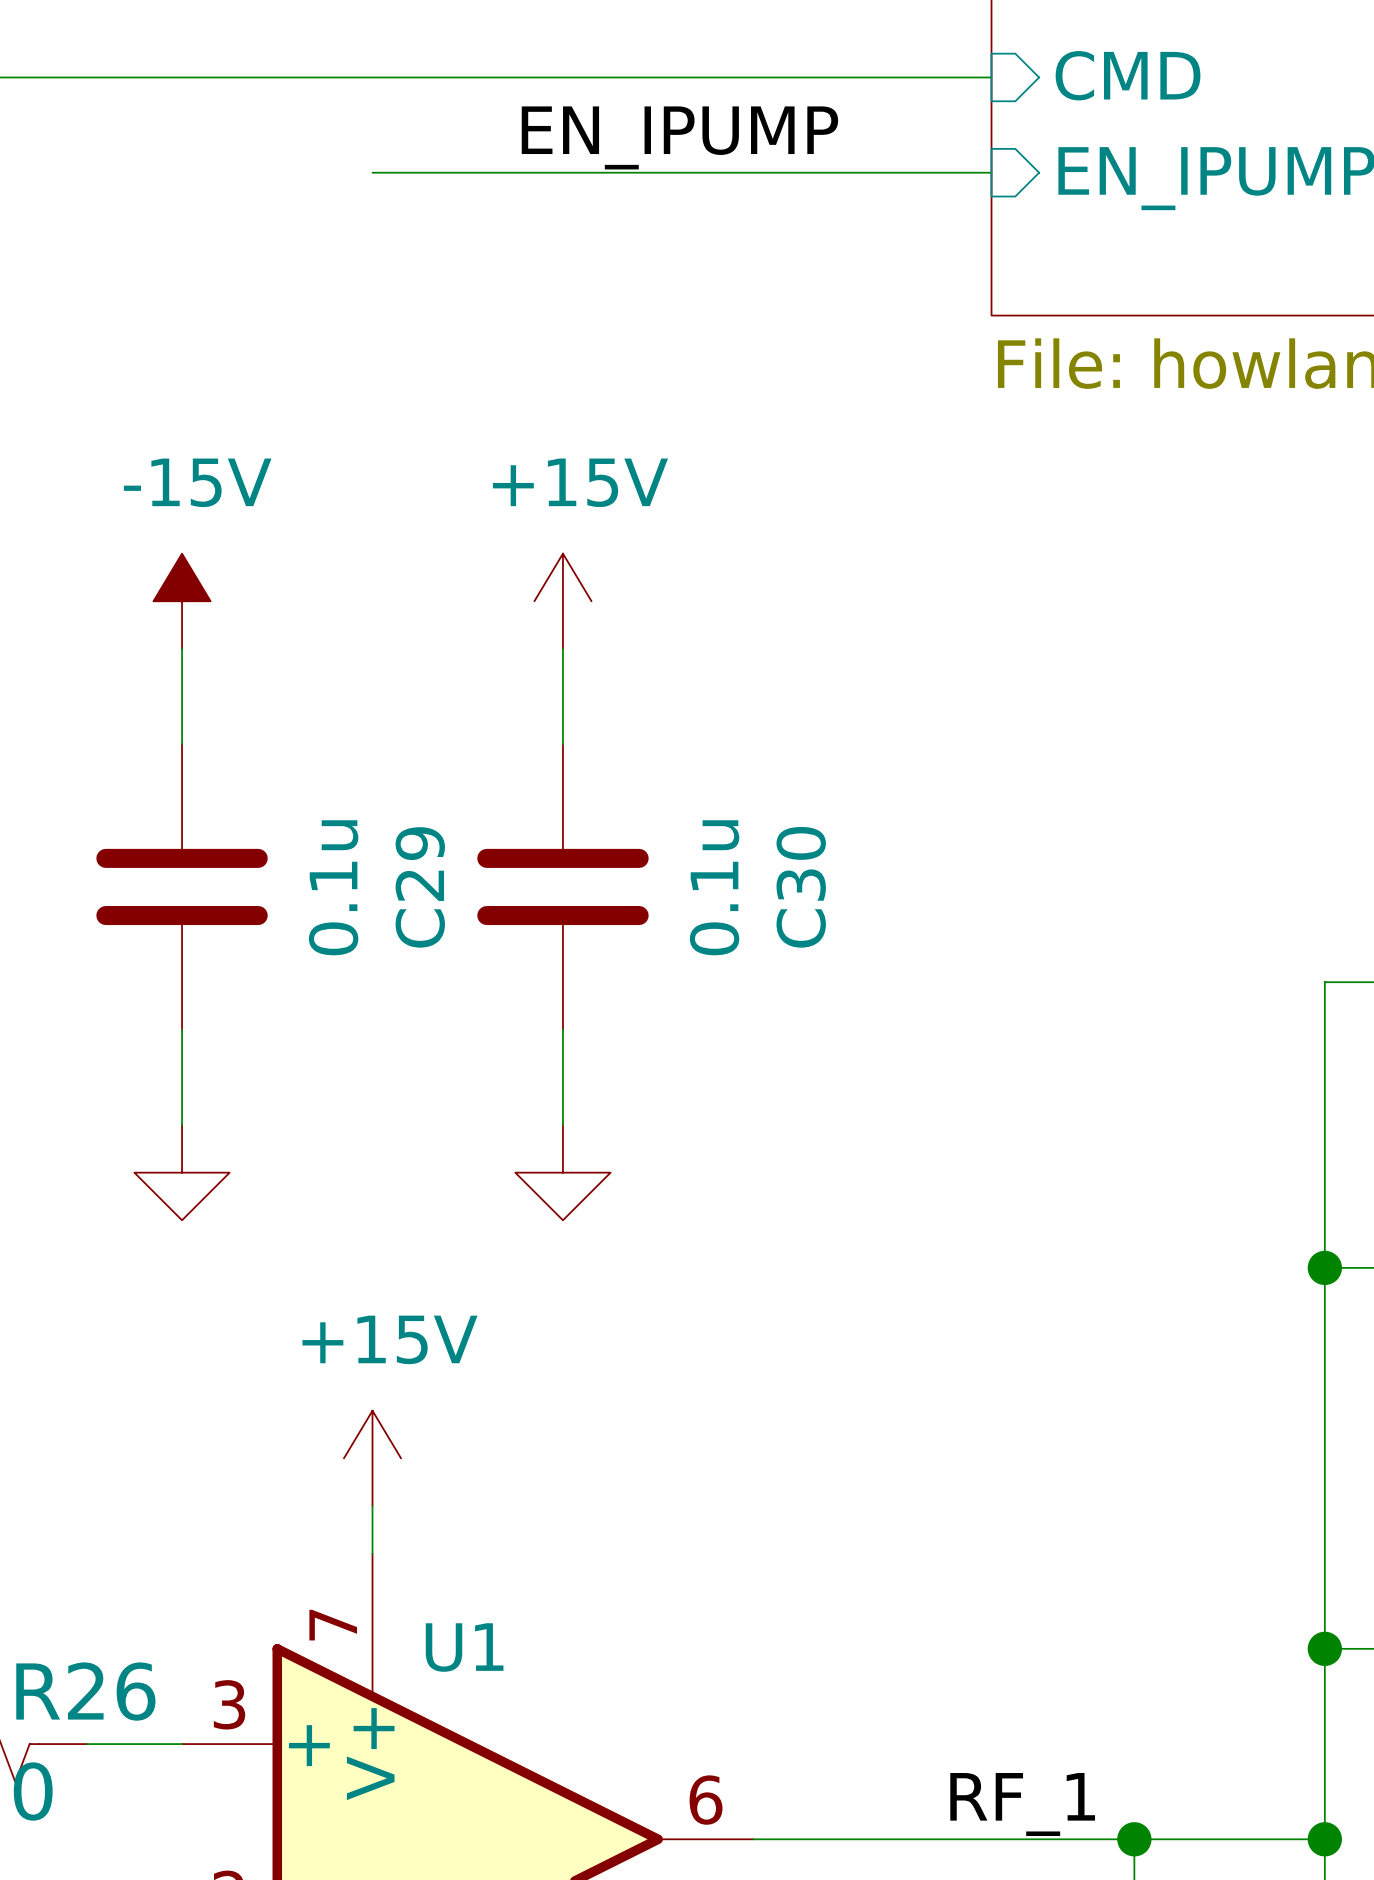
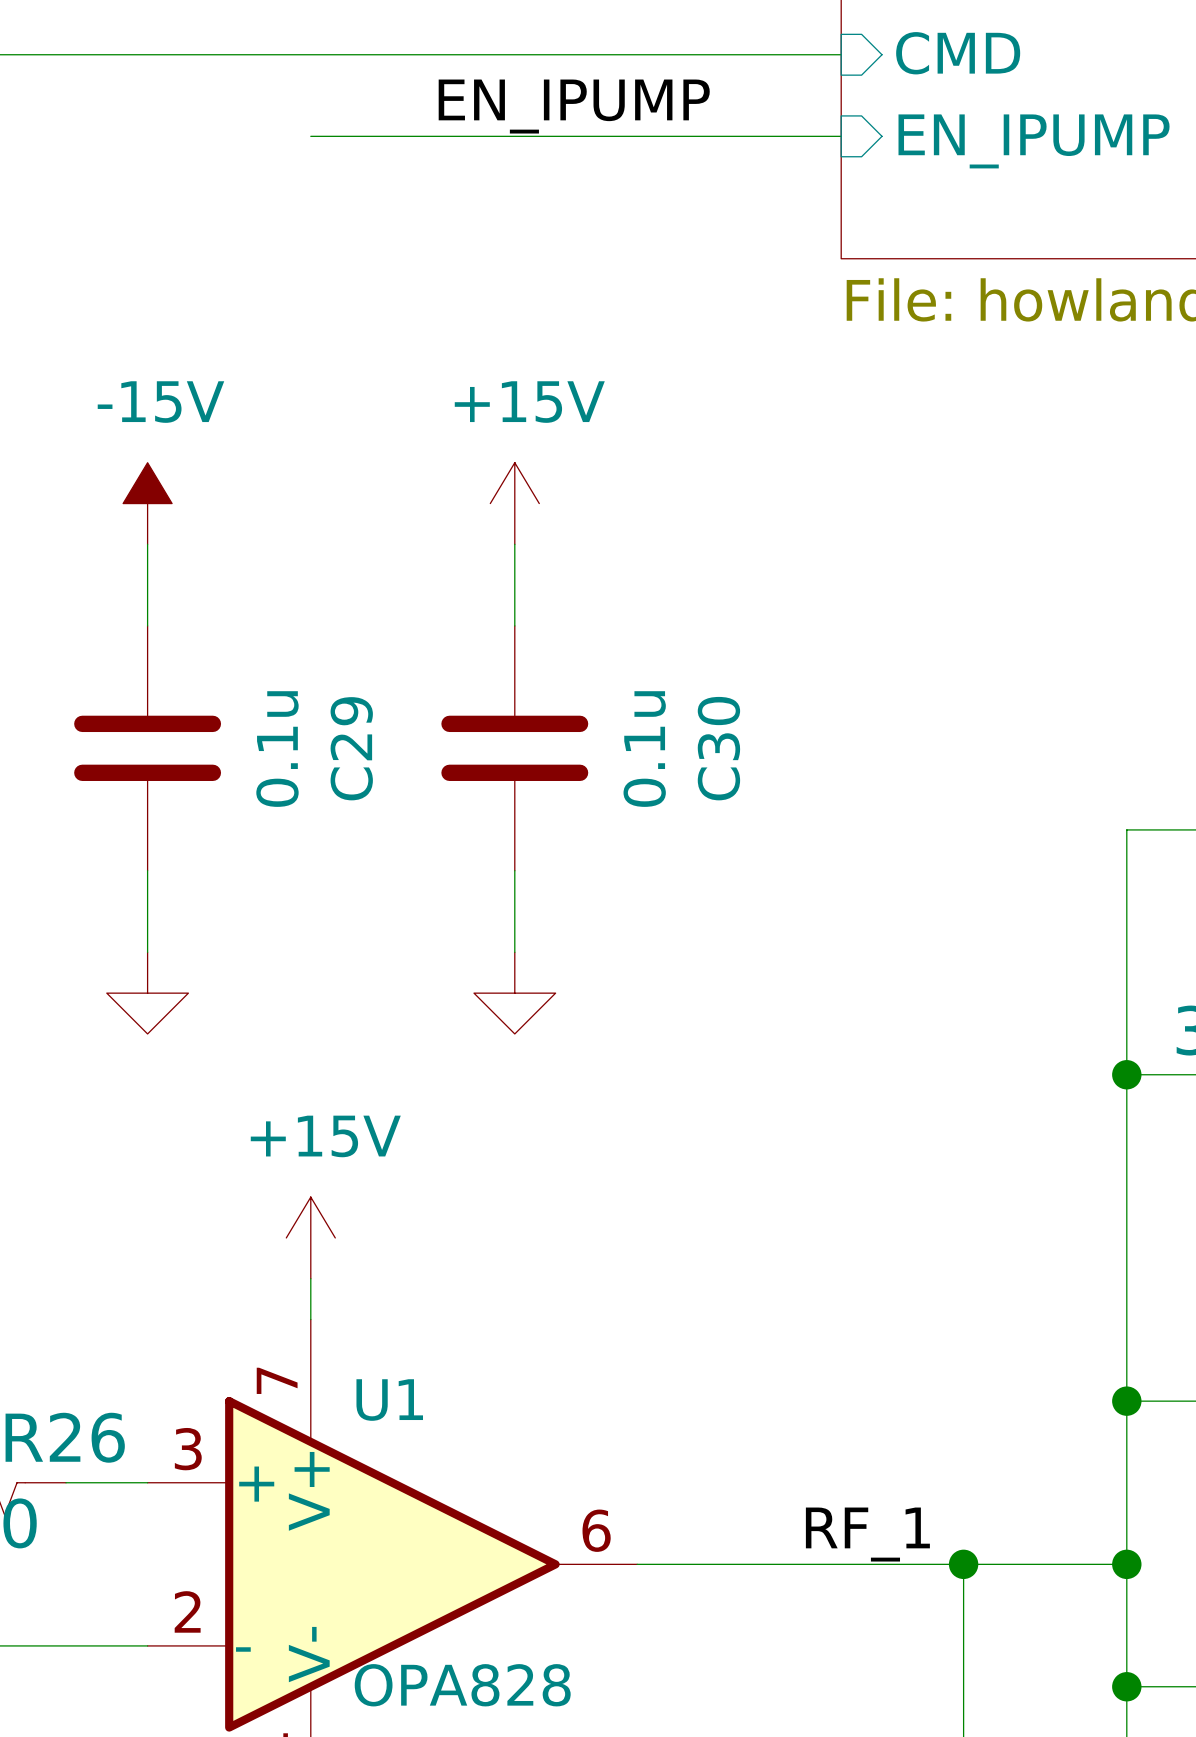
power symbol position: +15V (562, 601) -> +15V (514, 503)
wire: (562, 648) (562, 744) -> (514, 544) (514, 625)
C30 position: (562, 886) -> (514, 748)
wire: (562, 1029) (562, 1125) -> (514, 870) (514, 952)
power symbol position: (562, 1172) -> (514, 993)

